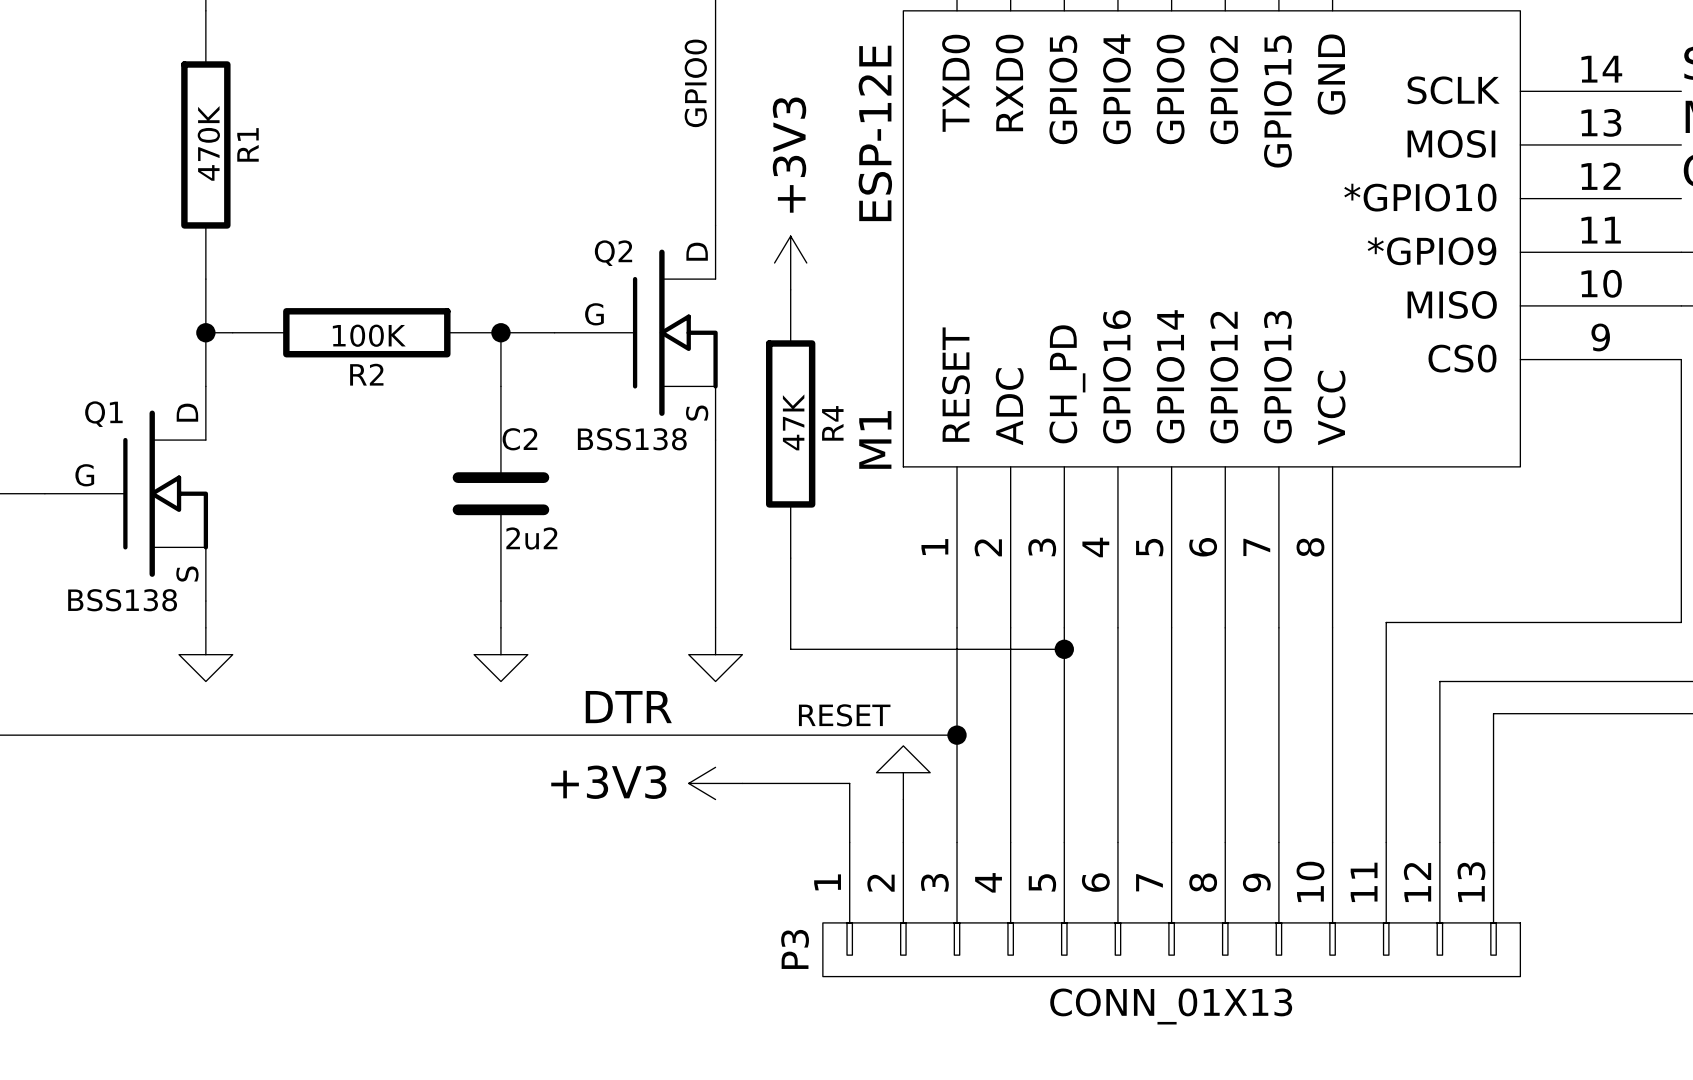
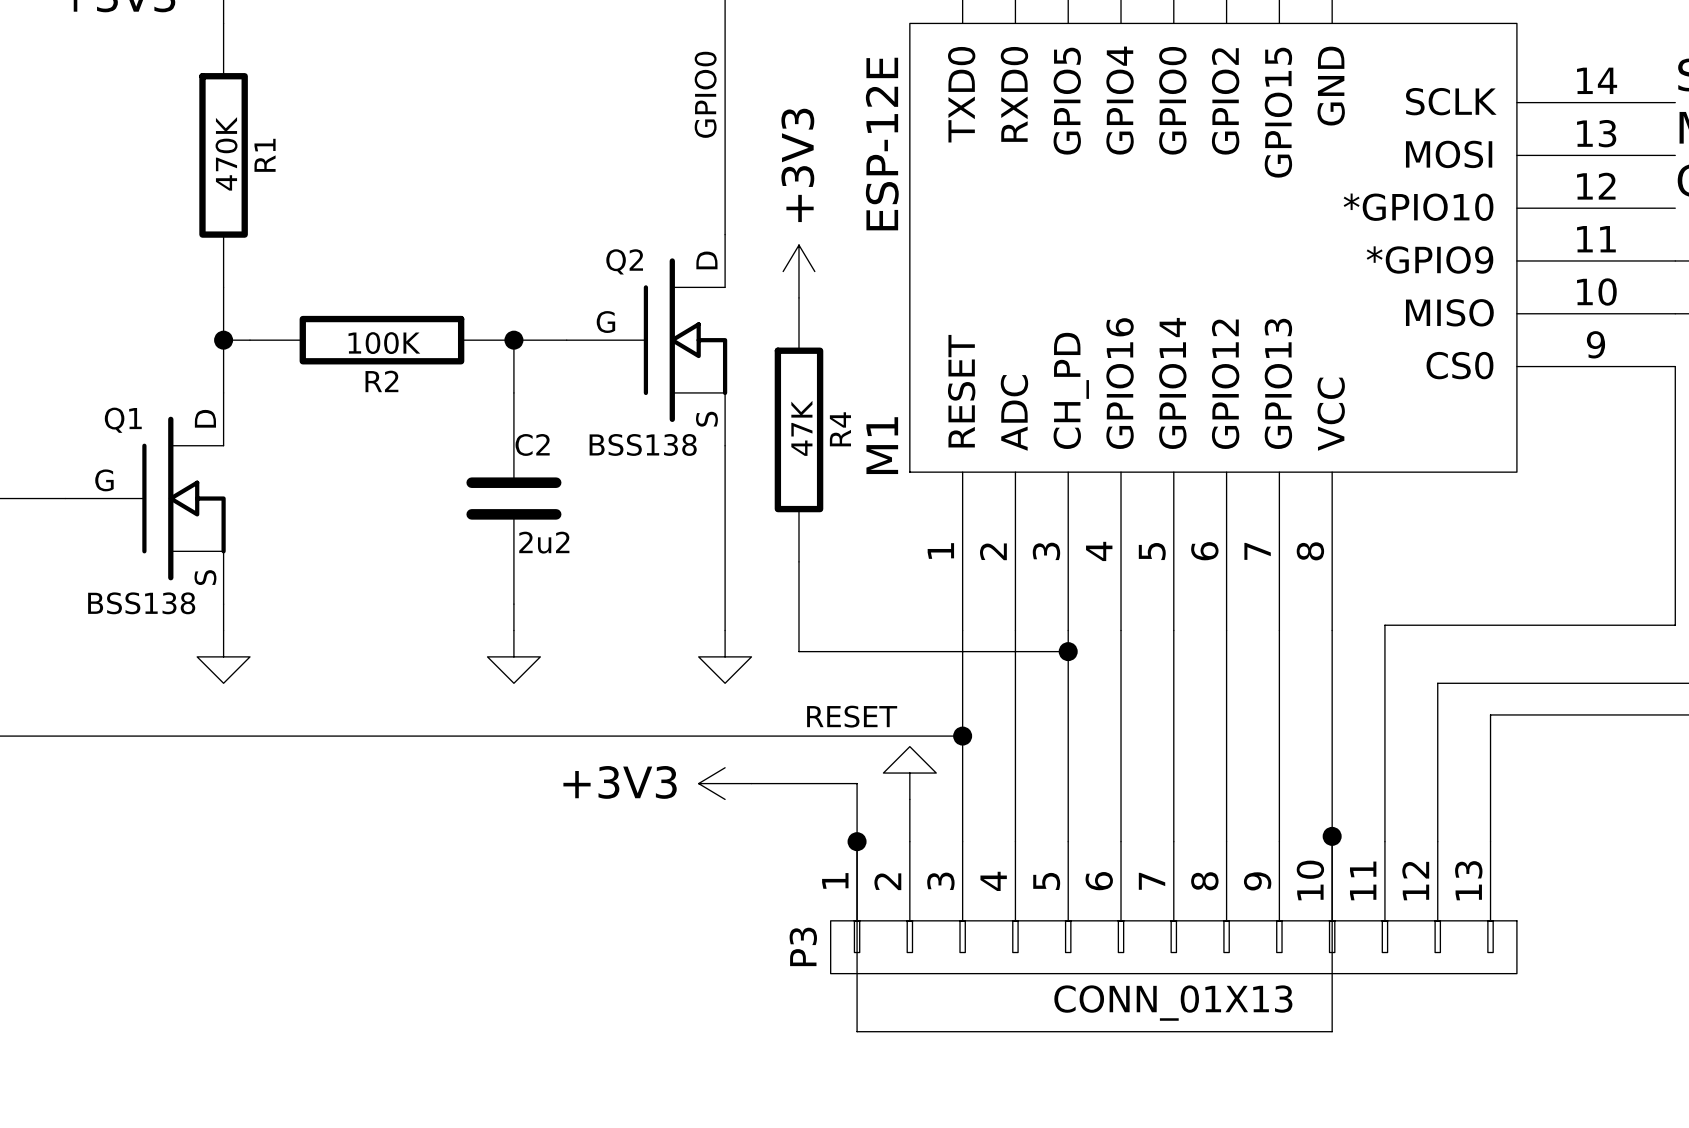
label: DTR (628, 707) -> none
junction: none -> (1332, 836)
wire: none -> (857, 841) (857, 1031) (1332, 1031) (1332, 841)
junction: none -> (857, 841)

